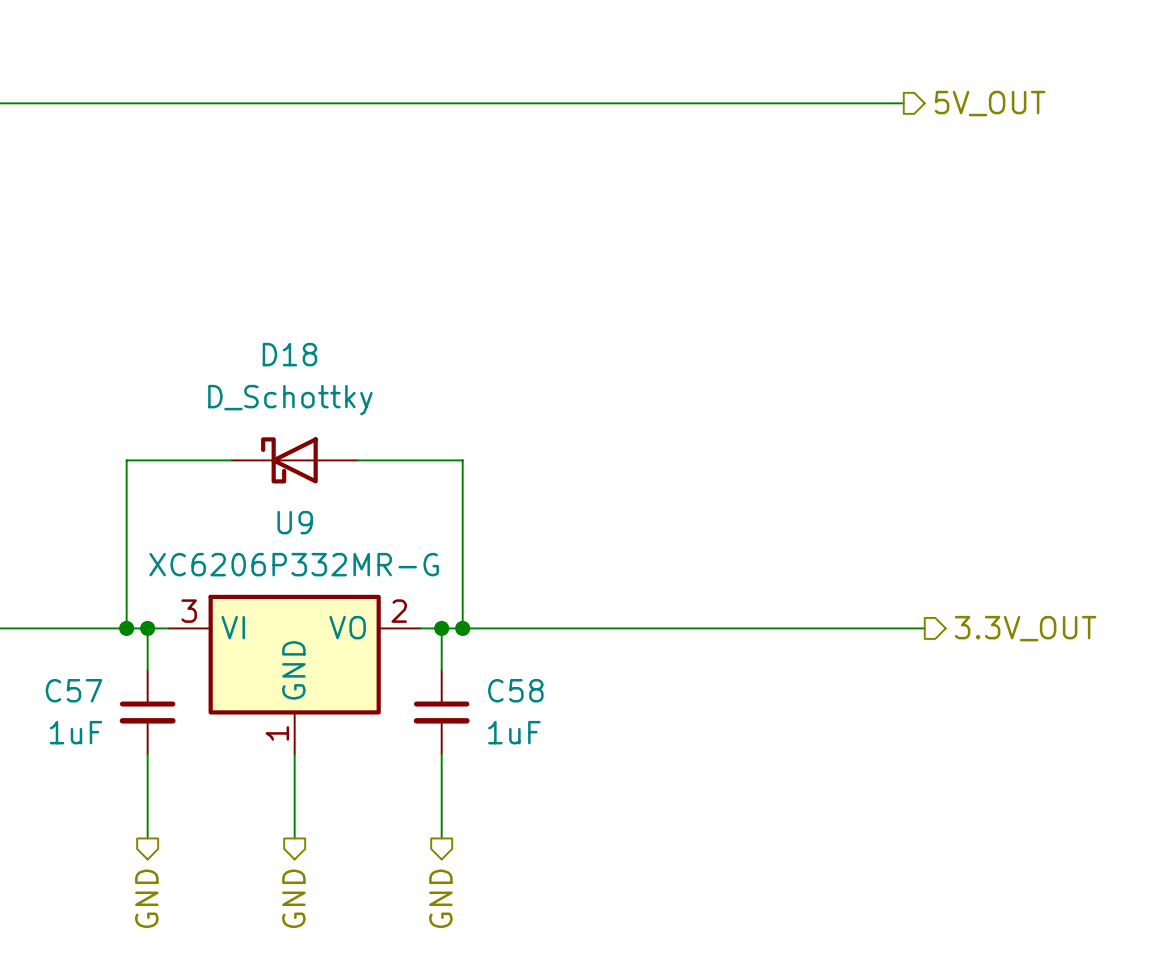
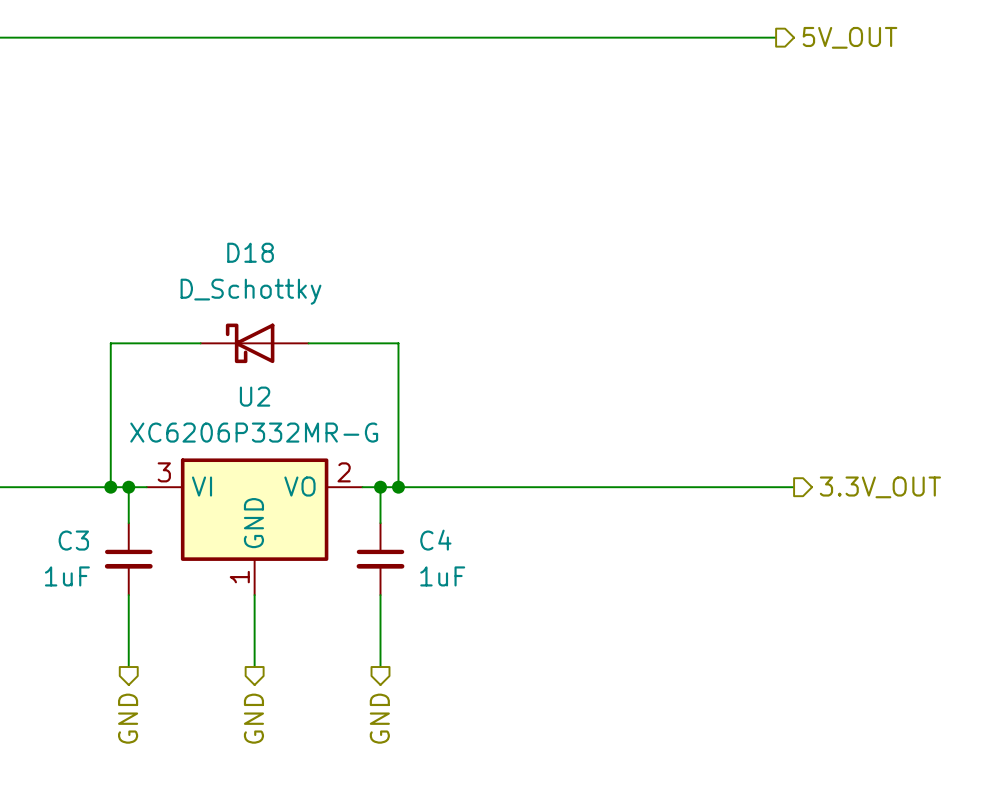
U9 name: U9 (295, 522) -> U2 (255, 396)
C57 name: C57 (73, 690) -> C3 (73, 540)
C58 name: C58 (515, 690) -> C4 (435, 540)

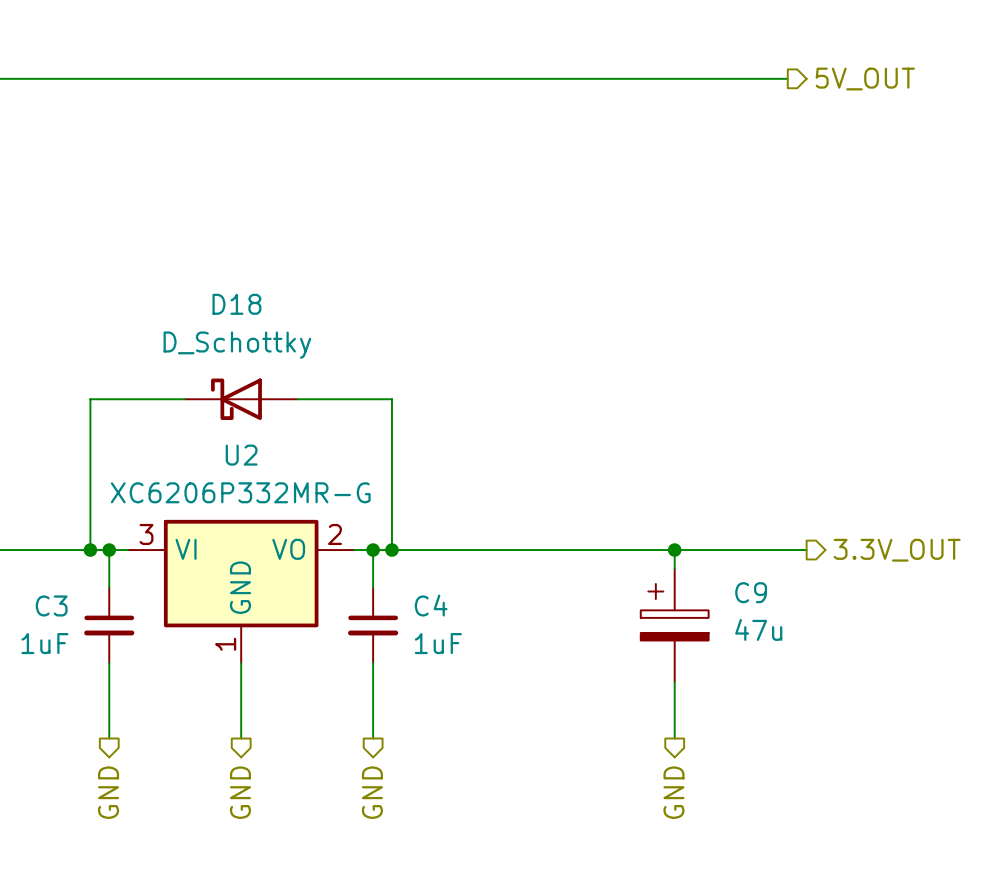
wire: none -> (674, 550) (674, 568)
junction: none -> (674, 550)
C9: none -> 47u (674, 625)
wire: none -> (674, 681) (674, 738)
hierarchical label: none -> GND (673, 792)

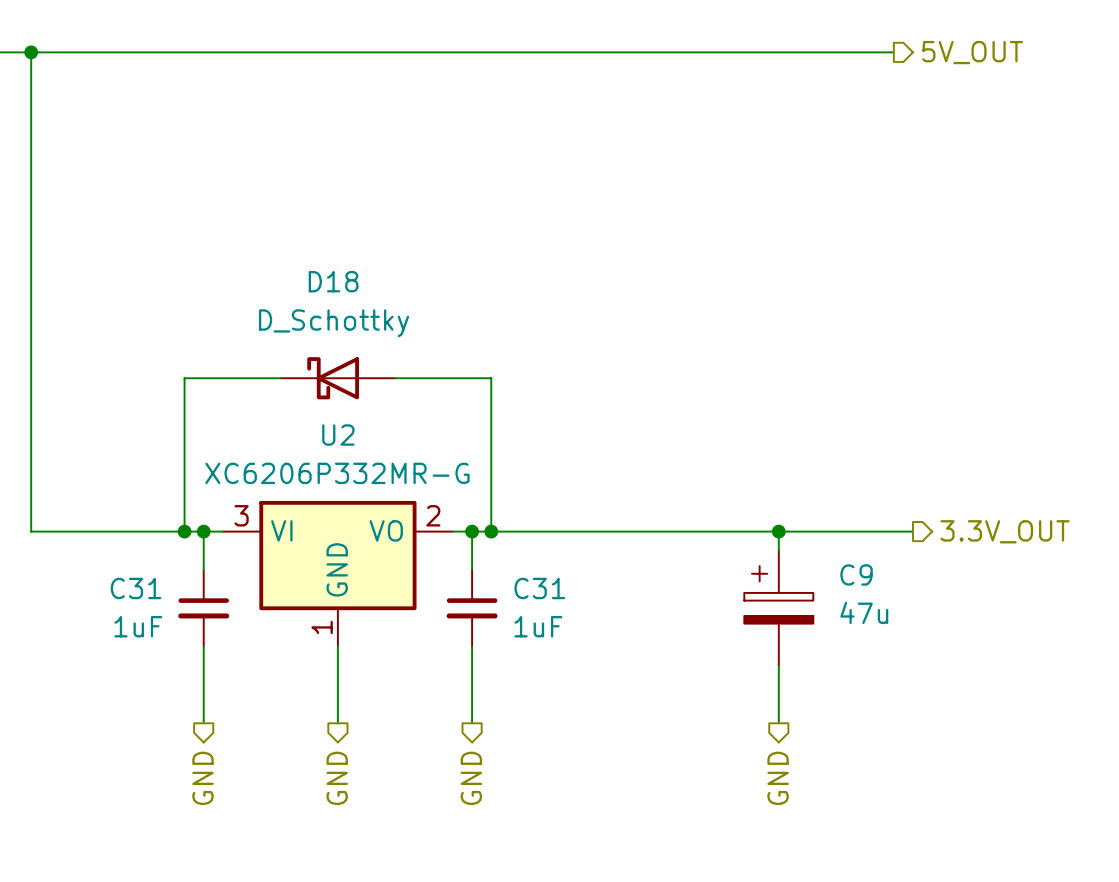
C3 name: C3 (51, 605) -> C31 (136, 588)
C4 name: C4 (431, 605) -> C31 (539, 588)

